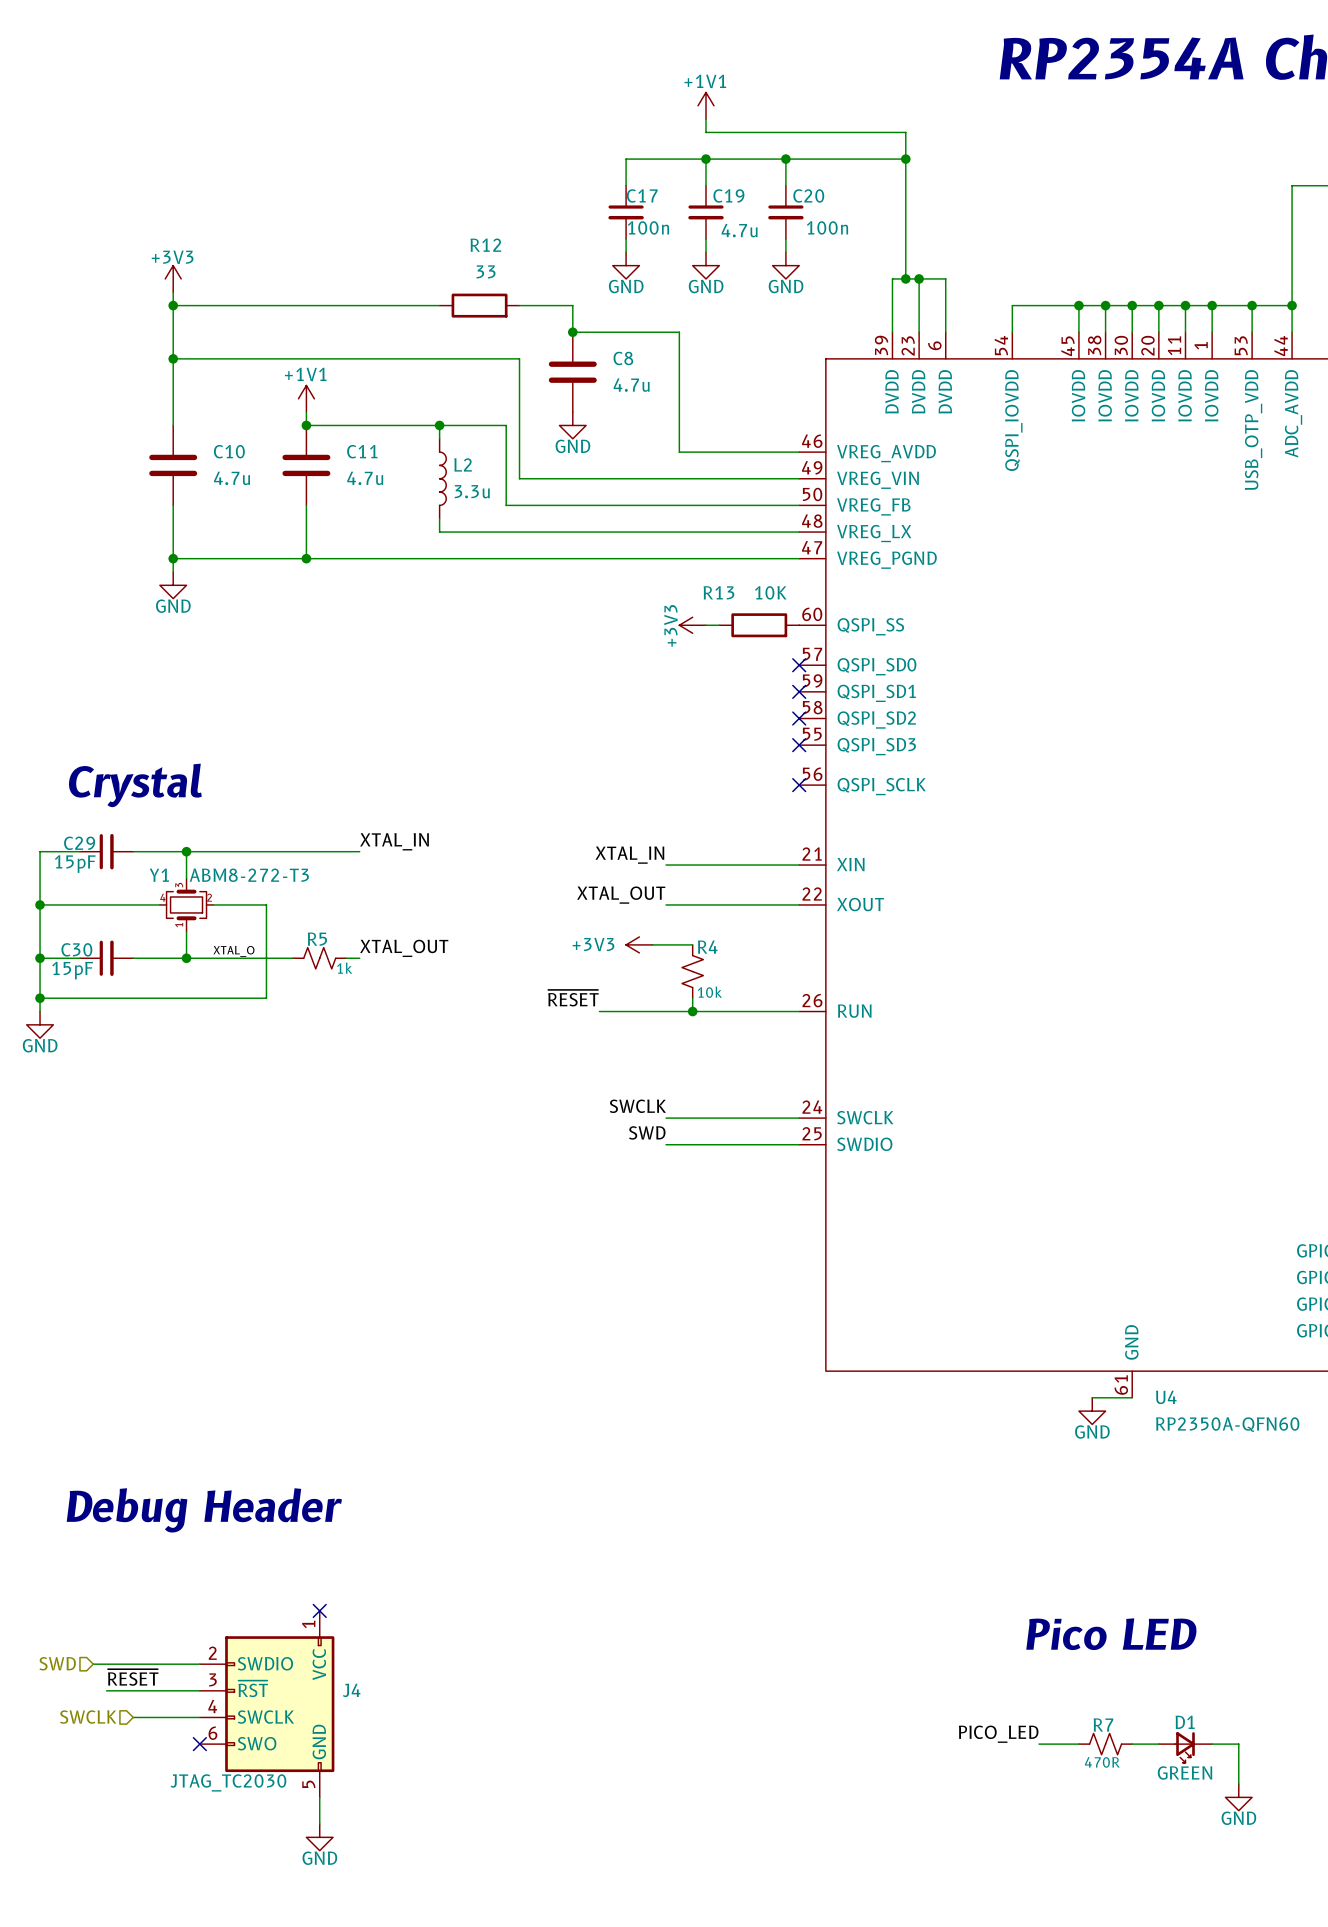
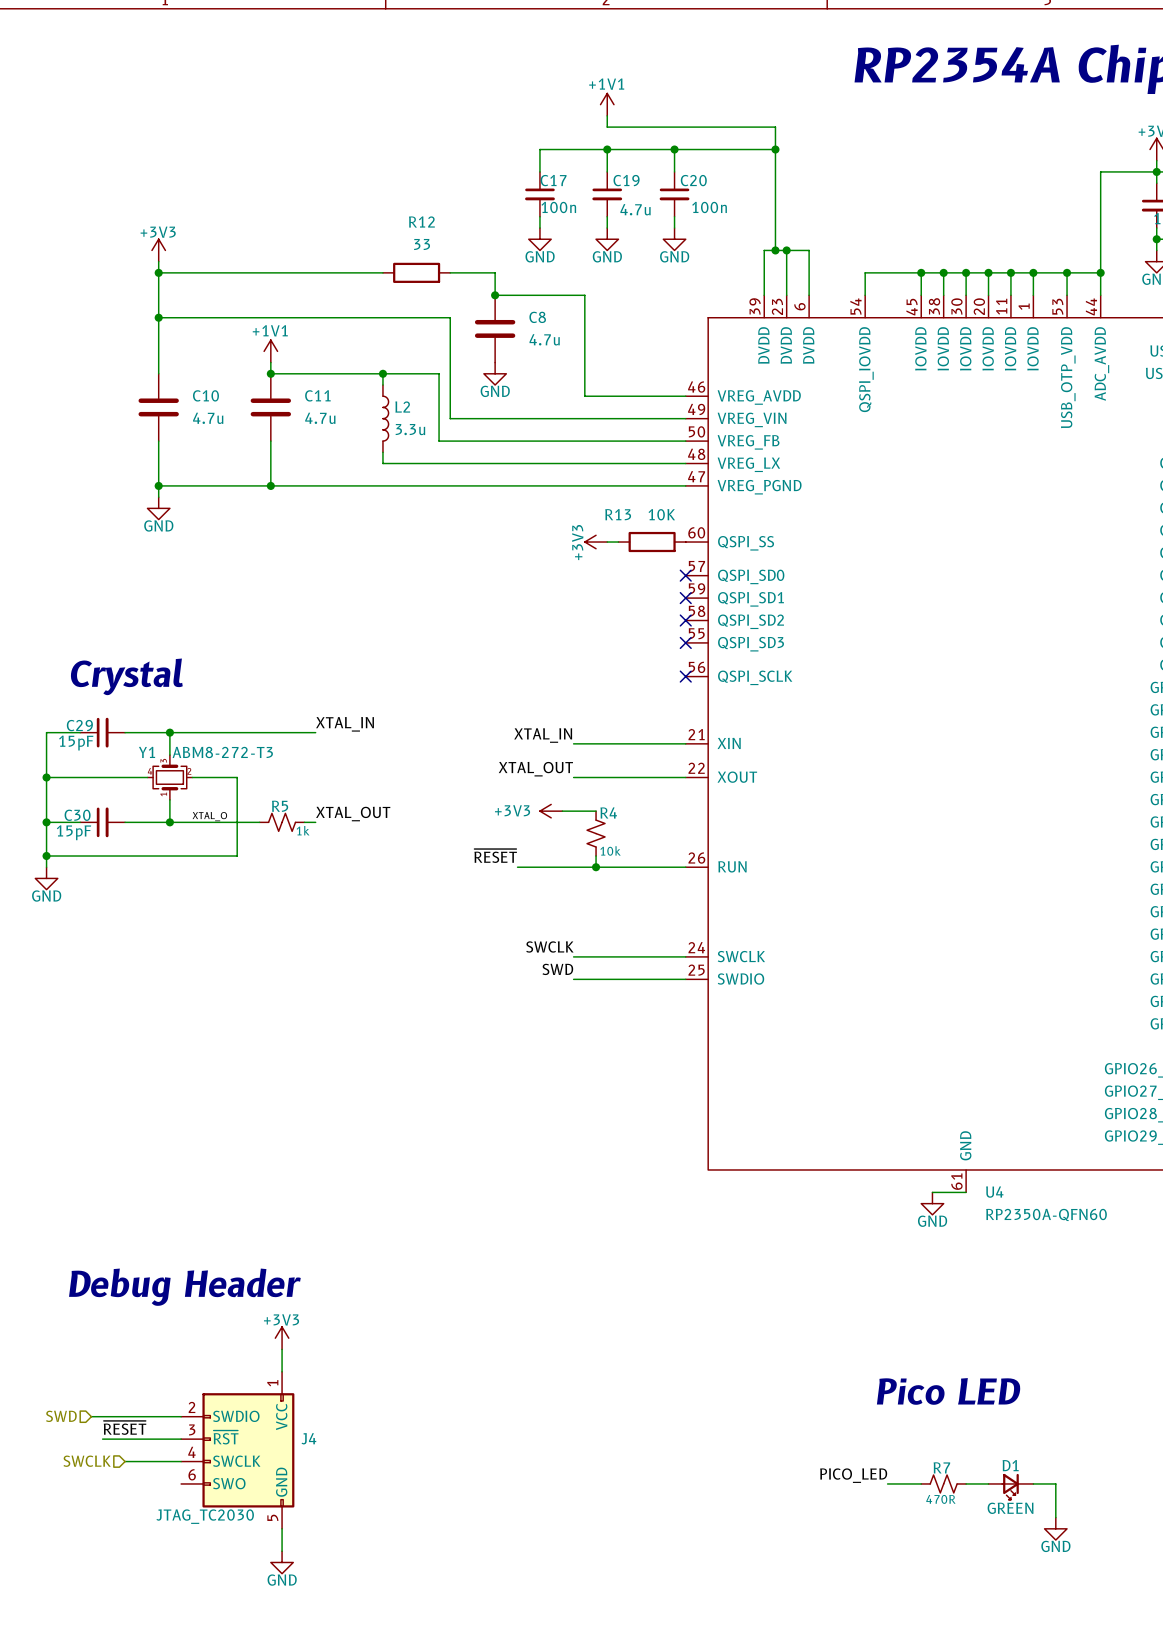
power symbol: none -> +3V3 (282, 1338)
wire: none -> (282, 1349) (282, 1371)
no-connect mark: (319, 1610) -> none
no-connect mark: (199, 1744) -> none

